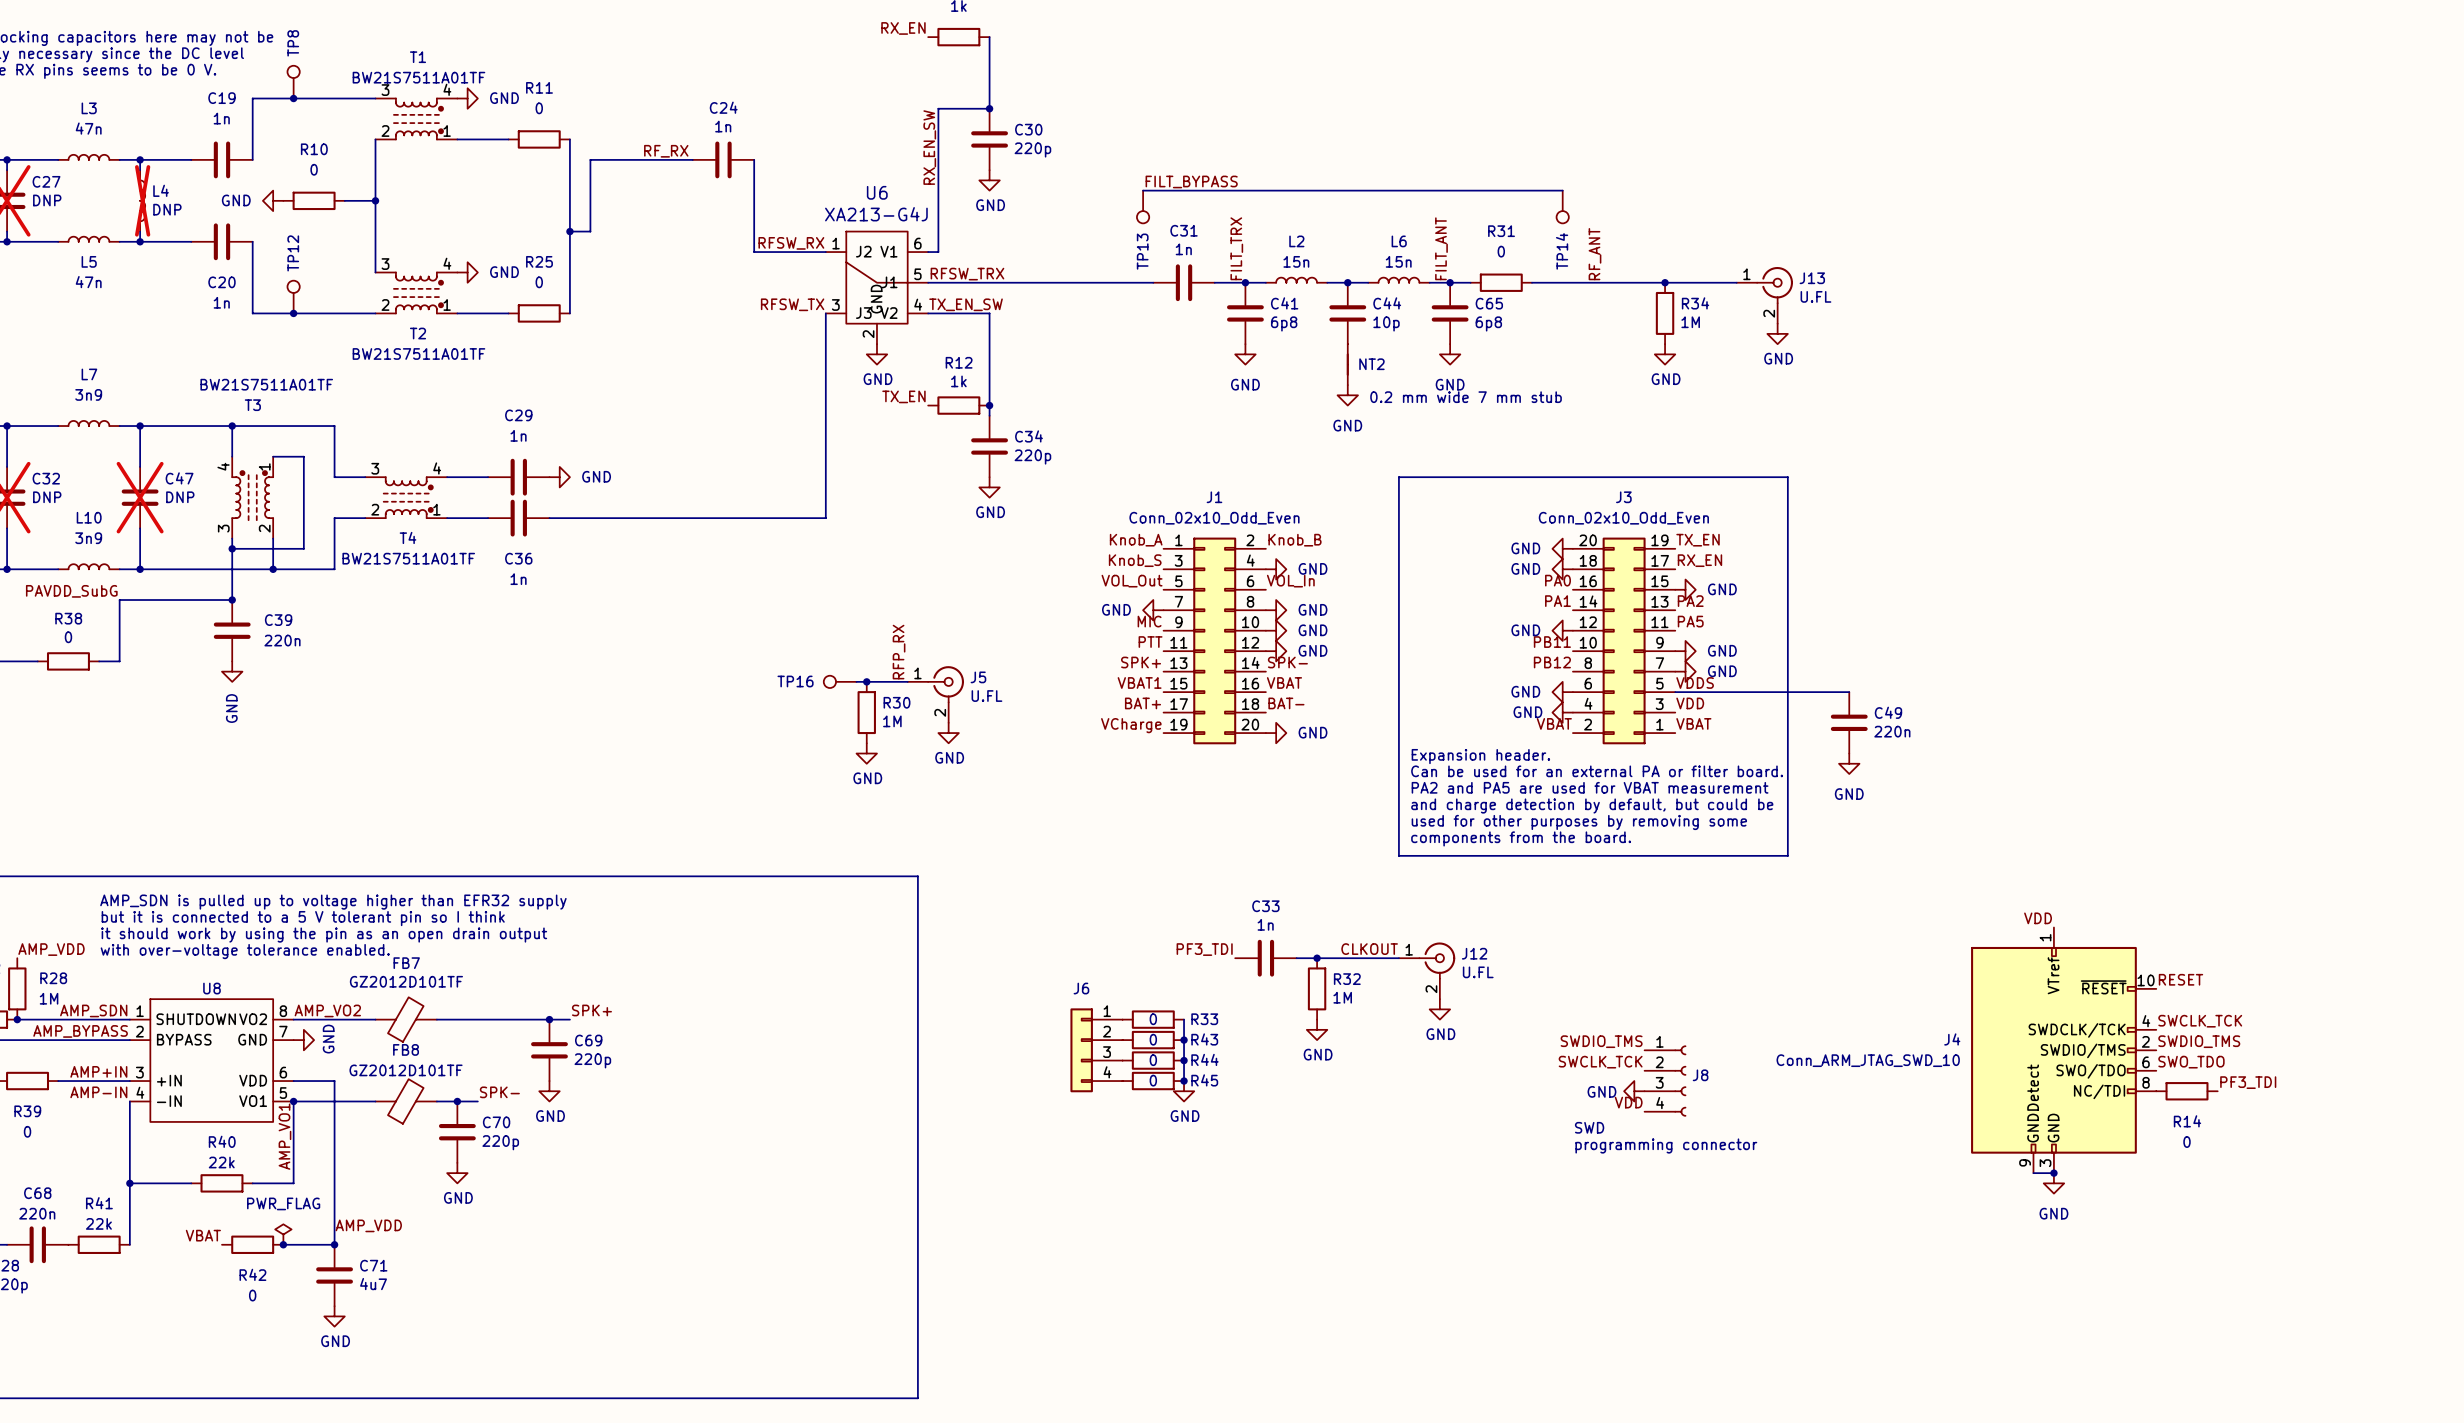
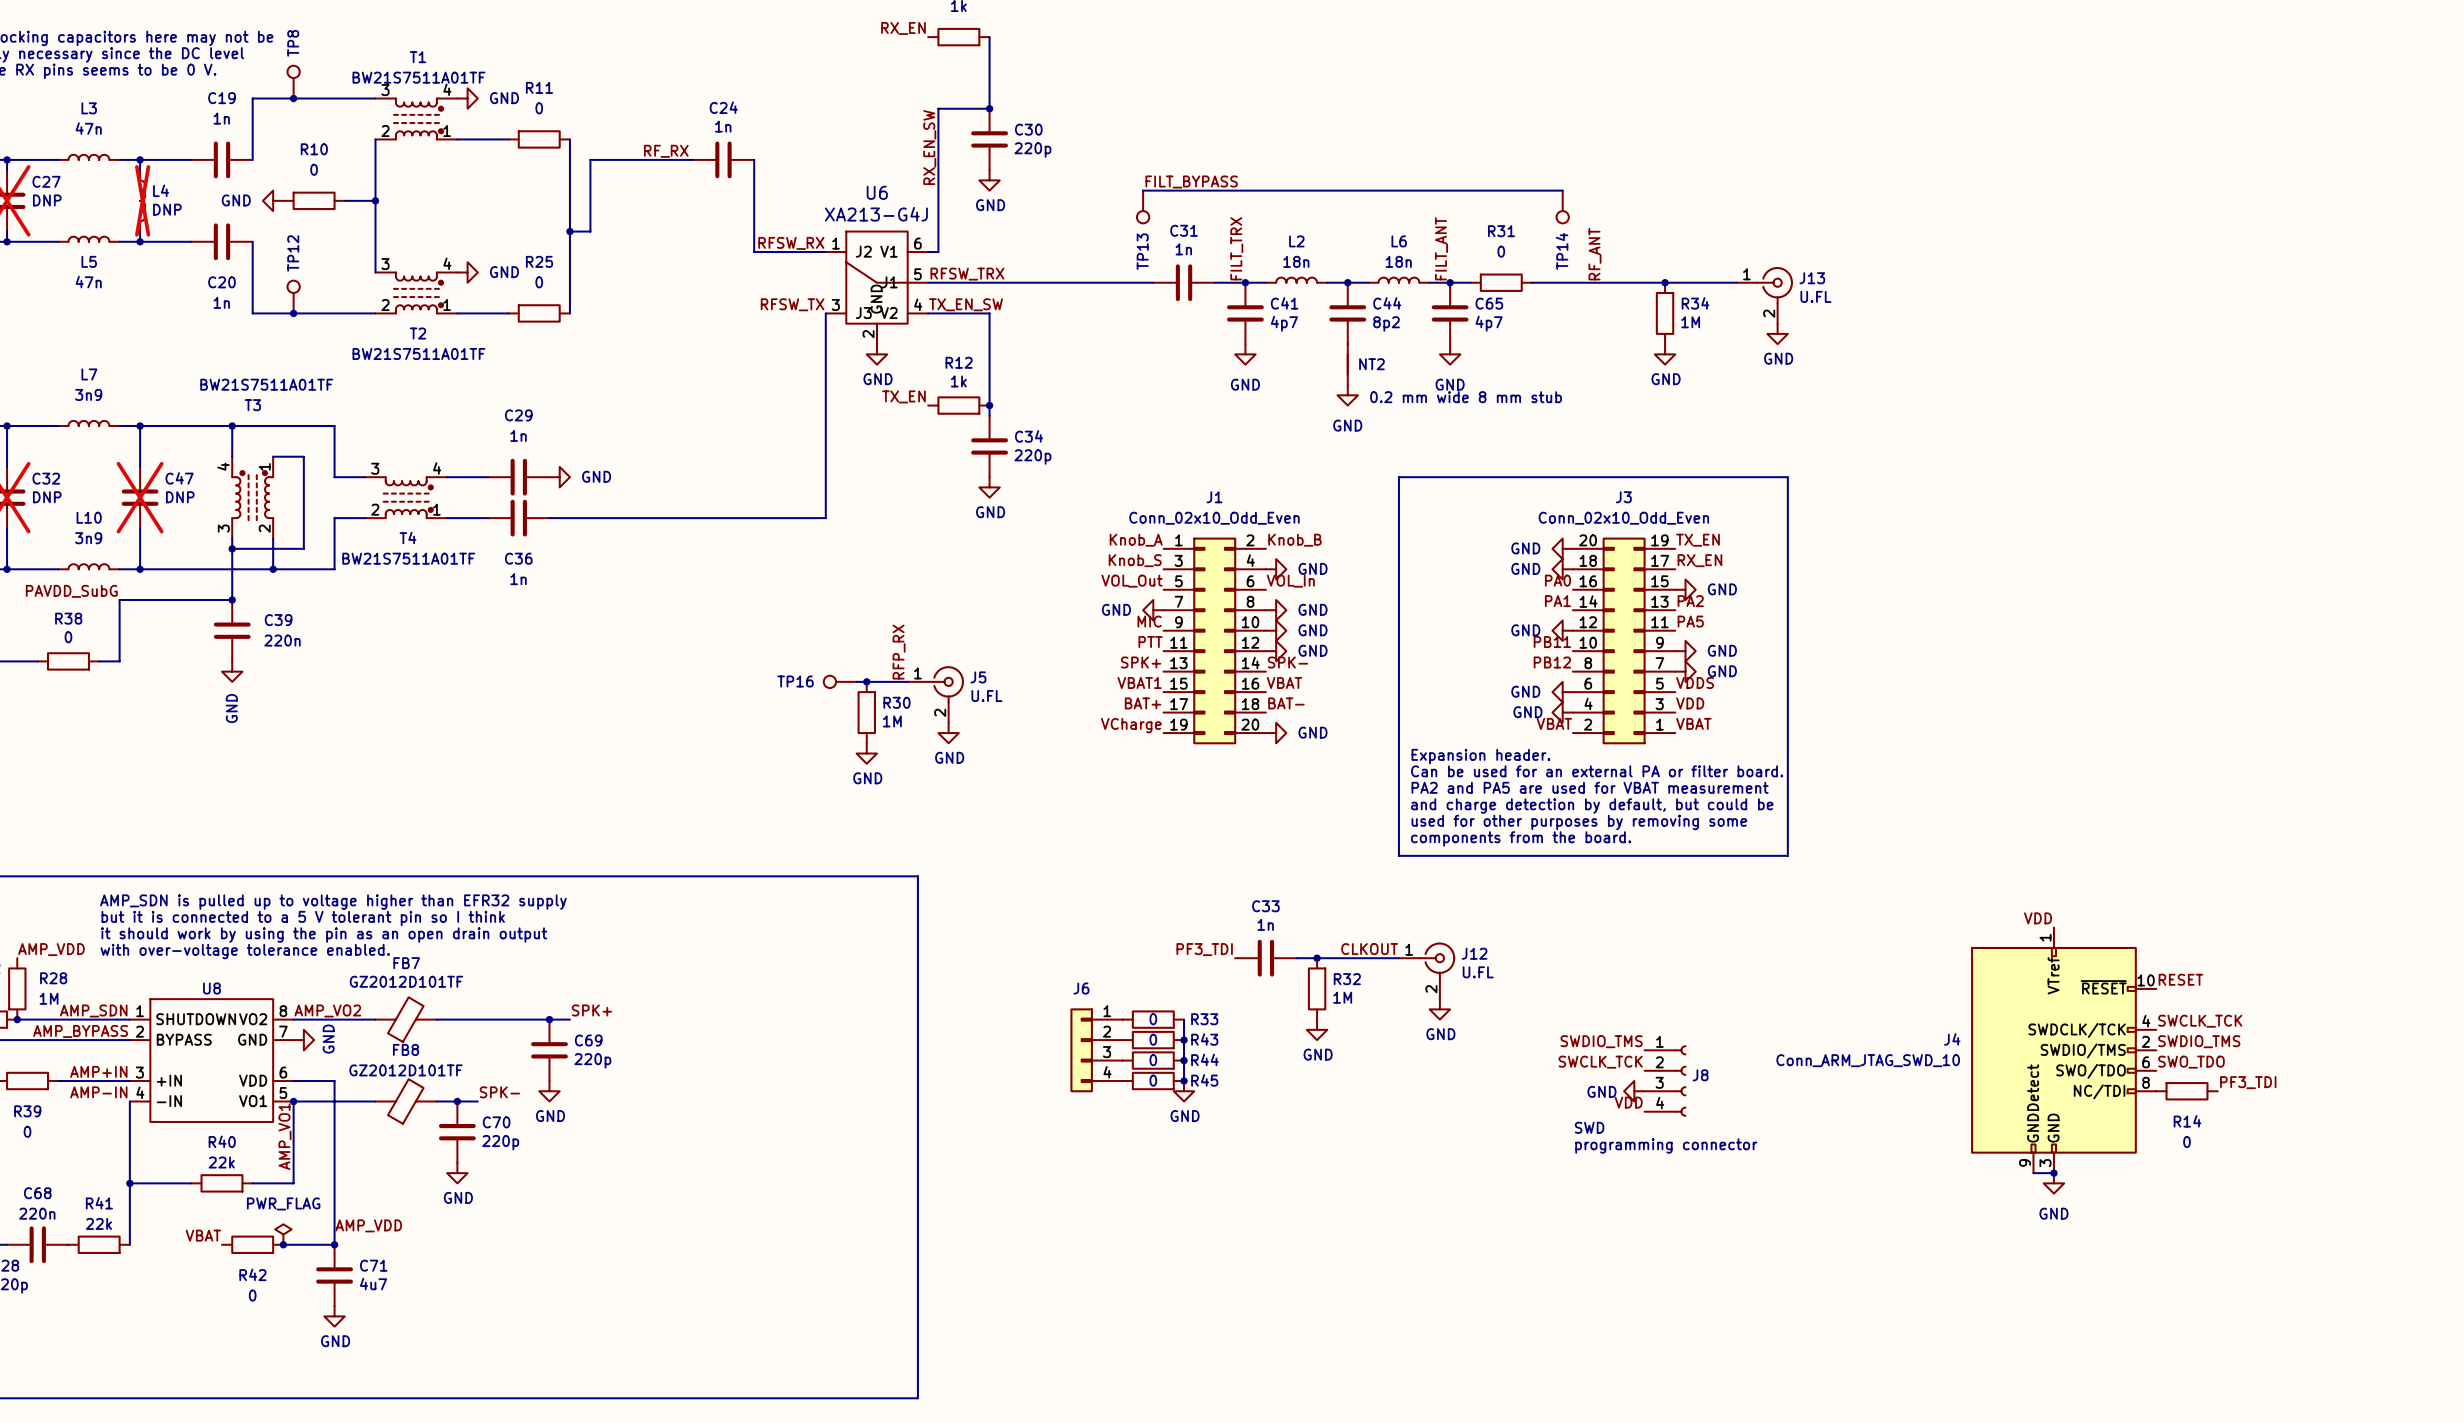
L2 value: 15n (1296, 261) -> 18n (1296, 261)
L6 value: 15n (1398, 261) -> 18n (1398, 261)
C41 value: 6p8 (1284, 323) -> 4p7 (1284, 323)
C44 value: 10p (1386, 323) -> 8p2 (1386, 323)
C65 value: 6p8 (1488, 323) -> 4p7 (1489, 323)
text: 0.2 mm wide 7 mm stub (1466, 397) -> 0.2 mm wide 8 mm stub (1466, 397)
wire: (1675, 692) (1849, 692) -> none
C49: 220n (1849, 722) -> none
power symbol: GND (1849, 763) -> none

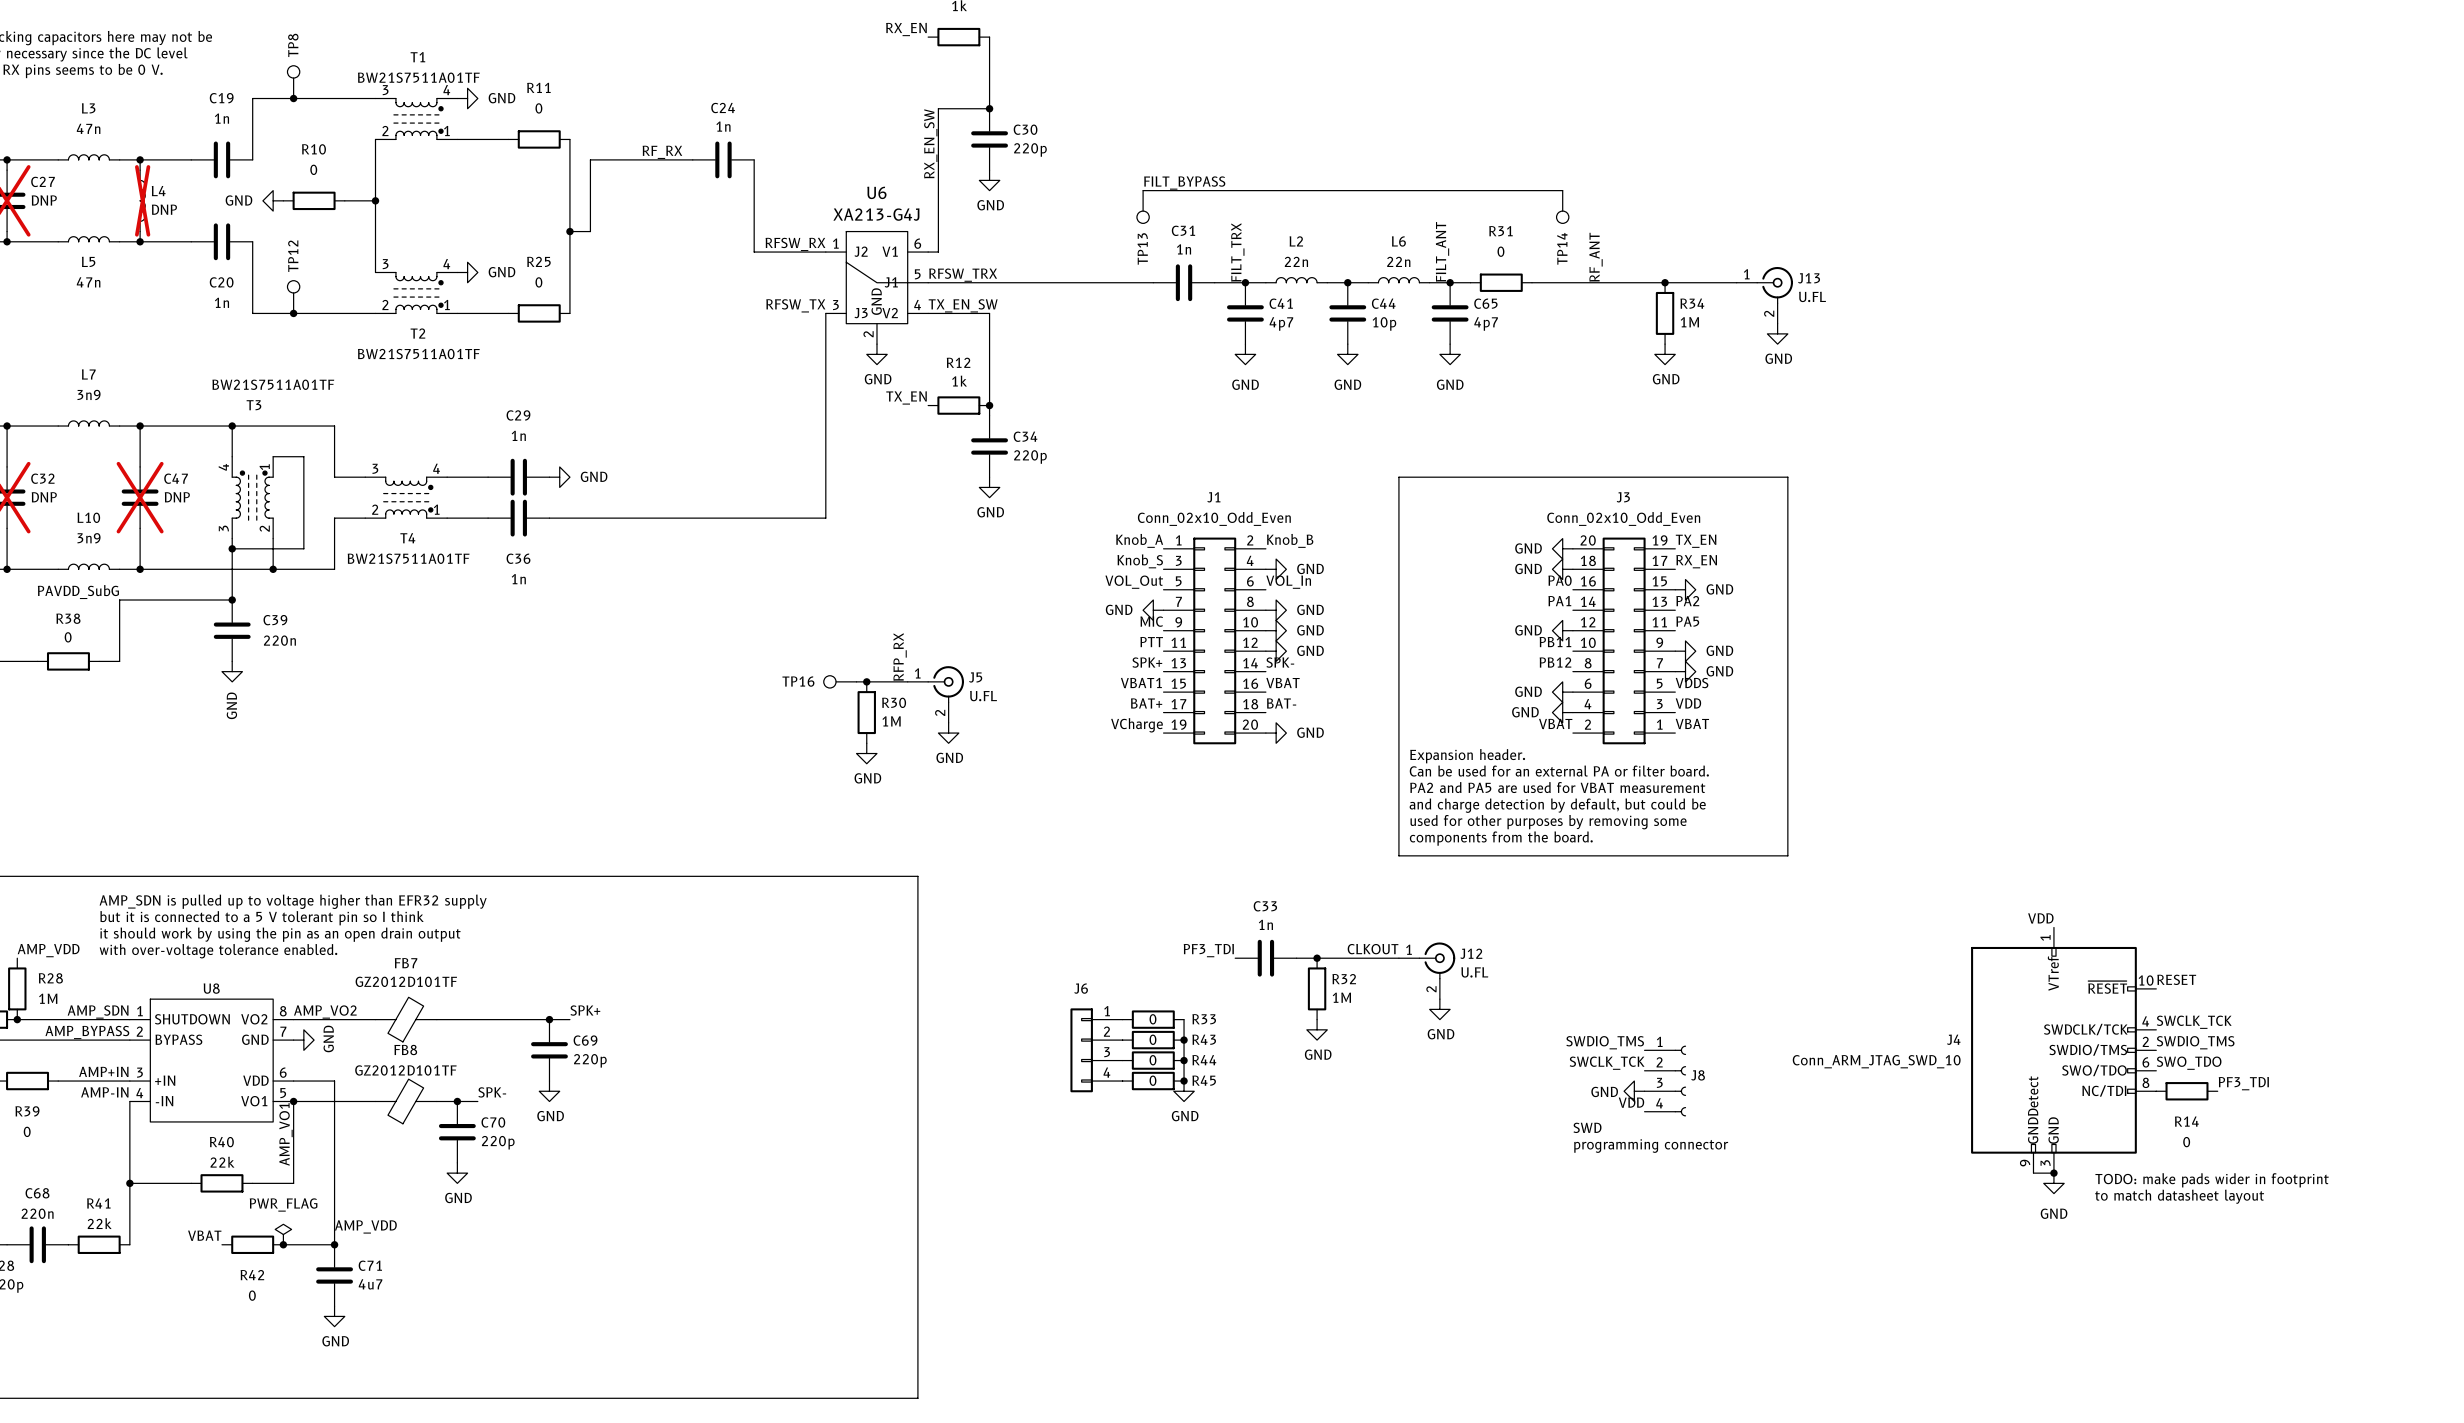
L2 value: 18n (1296, 261) -> 22n (1296, 261)
L6 value: 18n (1398, 261) -> 22n (1398, 261)
C44 value: 8p2 (1386, 323) -> 10p (1384, 323)
NT2: (1347, 364) -> none
power symbol position: GND (1347, 395) -> GND (1347, 354)
text: 0.2 mm wide 8 mm stub (1466, 397) -> none
text: none -> TODO: make pads wider in footprint (2212, 1180)
text: none -> to match datasheet layout (2179, 1196)

